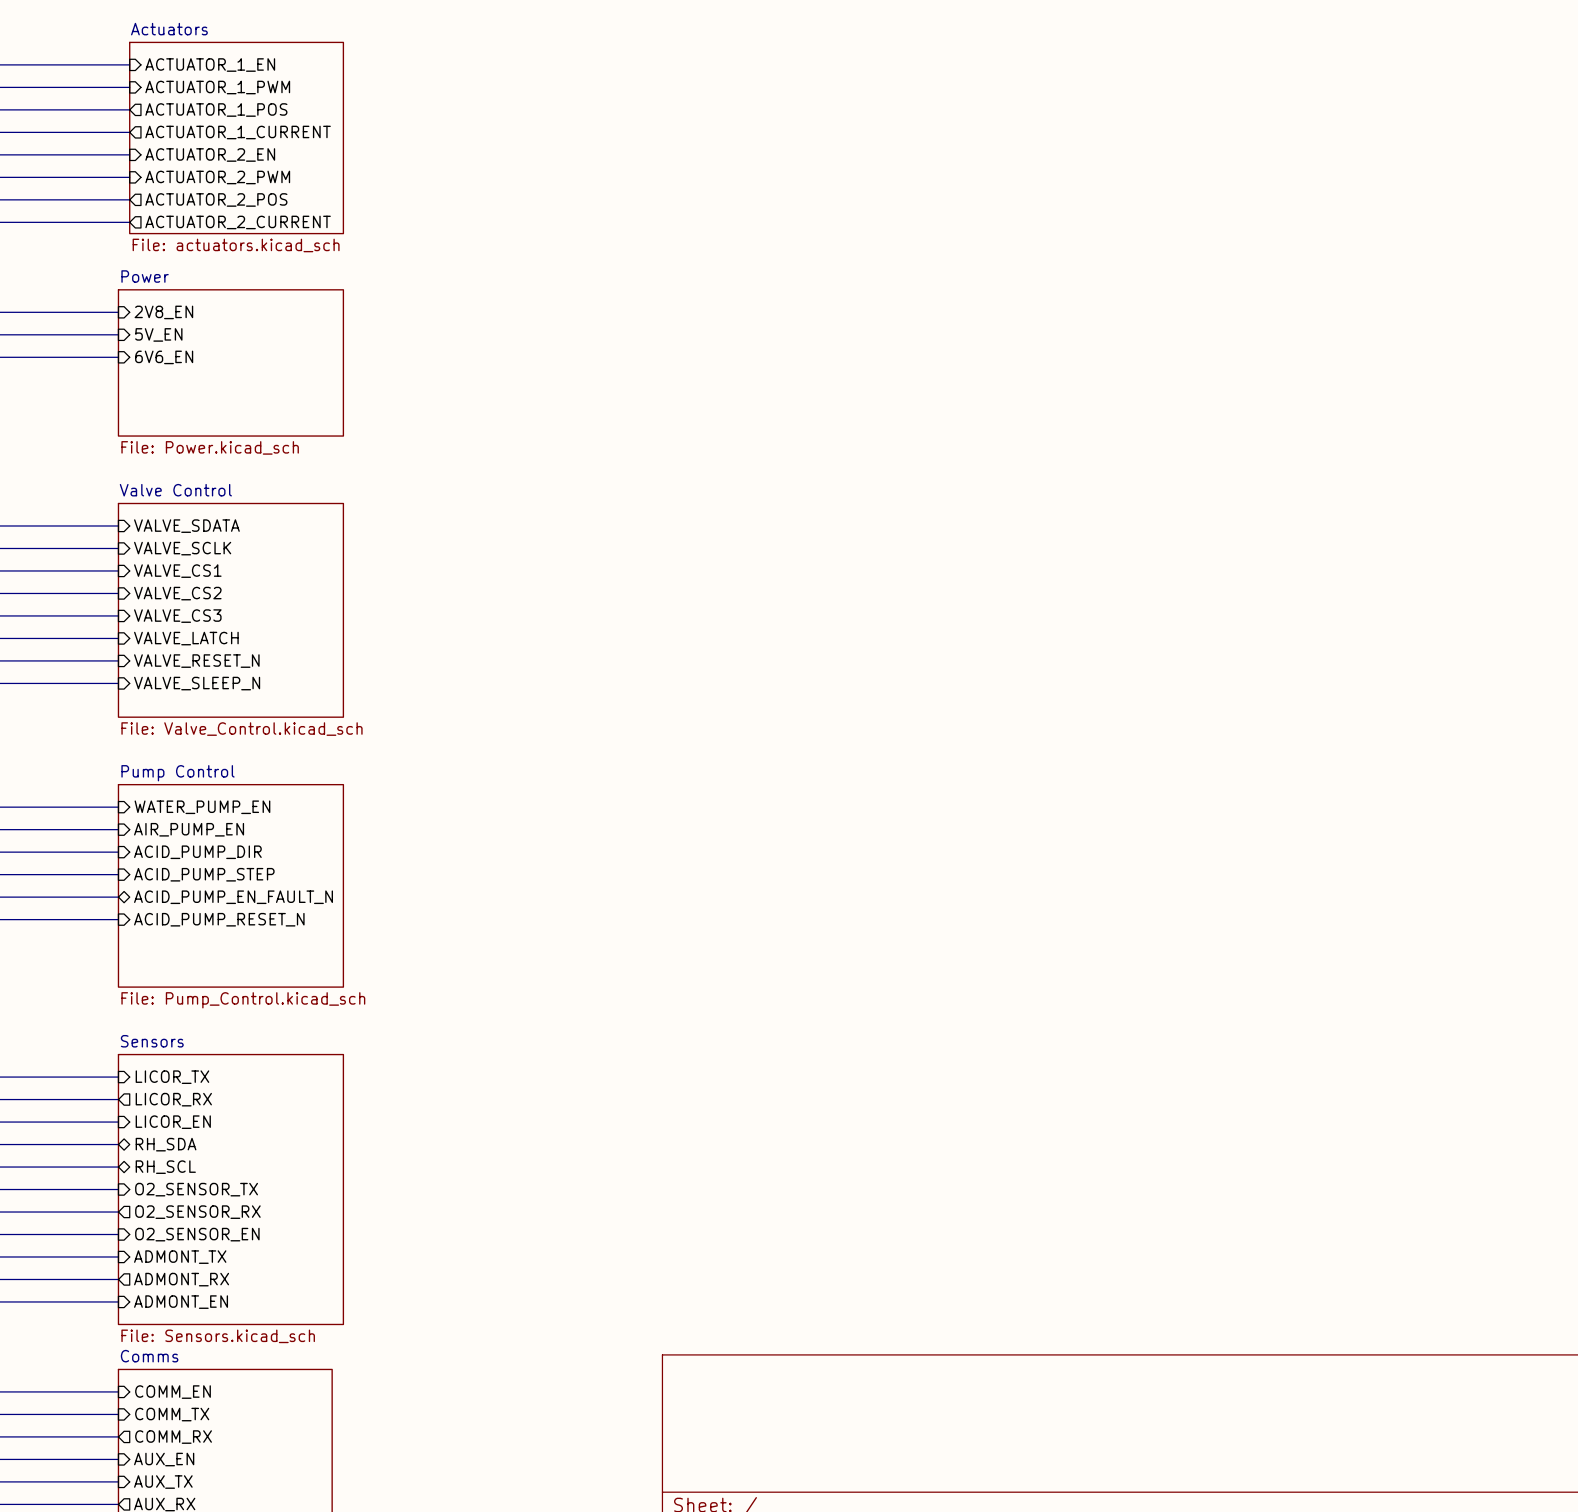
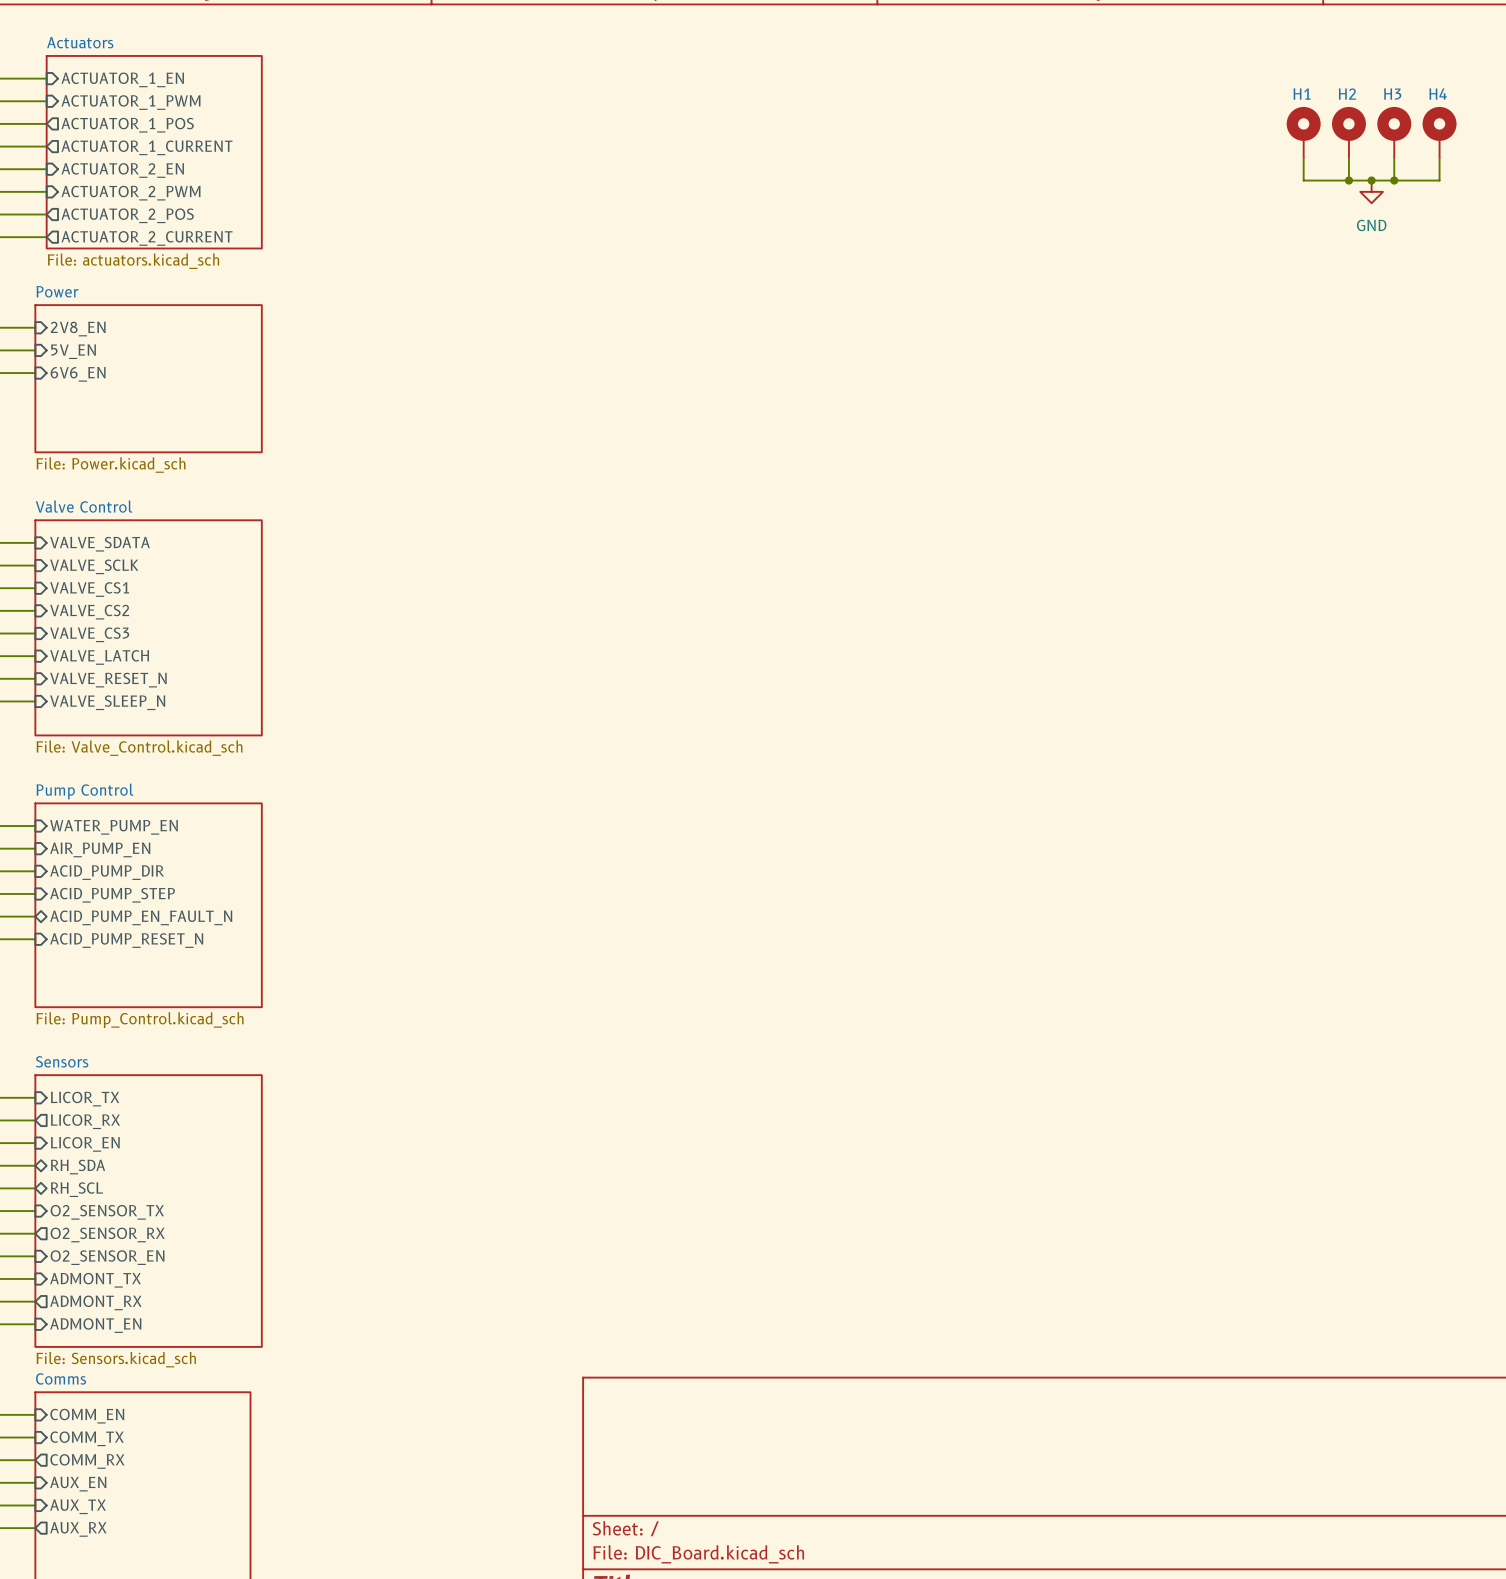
H1: none -> (1303, 132)
H2: none -> (1348, 132)
H3: none -> (1394, 132)
H4: none -> (1439, 132)
wire: none -> (1303, 157) (1303, 180) (1439, 180) (1439, 157)
wire: none -> (1348, 157) (1348, 180)
wire: none -> (1394, 157) (1394, 180)
junction: none -> (1348, 180)
junction: none -> (1371, 180)
junction: none -> (1394, 180)
power symbol: none -> GND (1371, 191)

